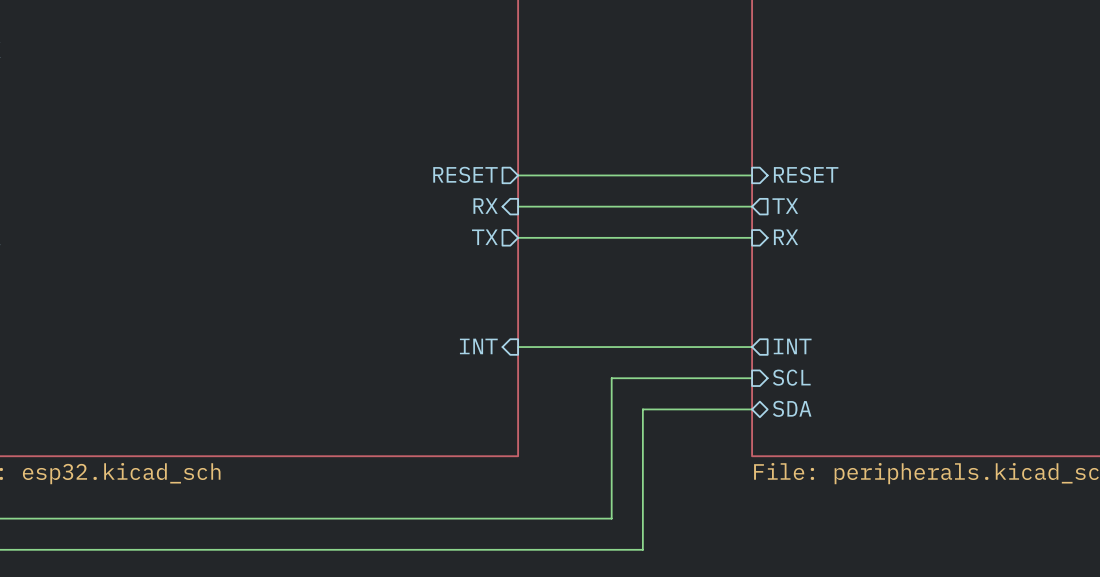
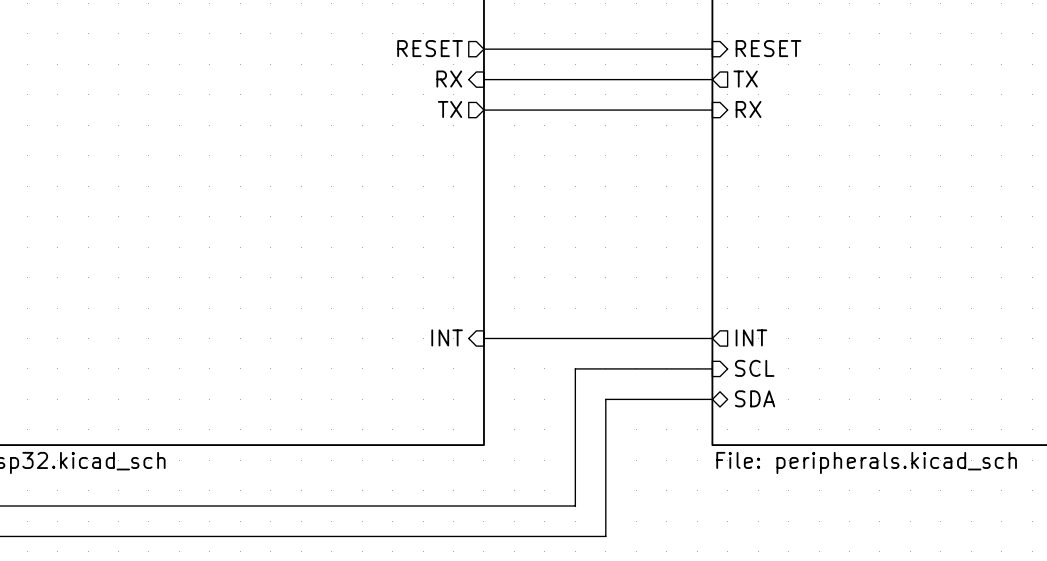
sheet pin position: RESET (465, 174) -> RESET (430, 48)
sheet pin position: RESET (806, 174) -> RESET (768, 48)
wire: (518, 175) (752, 175) -> (483, 49) (712, 49)
sheet pin position: RX (485, 206) -> RX (449, 79)
wire: (518, 206) (752, 206) -> (483, 79) (712, 79)
sheet pin position: TX (785, 206) -> TX (745, 79)
sheet pin position: TX (484, 237) -> TX (450, 109)
wire: (518, 237) (752, 237) -> (483, 110) (712, 110)
sheet pin position: RX (786, 237) -> RX (748, 109)

